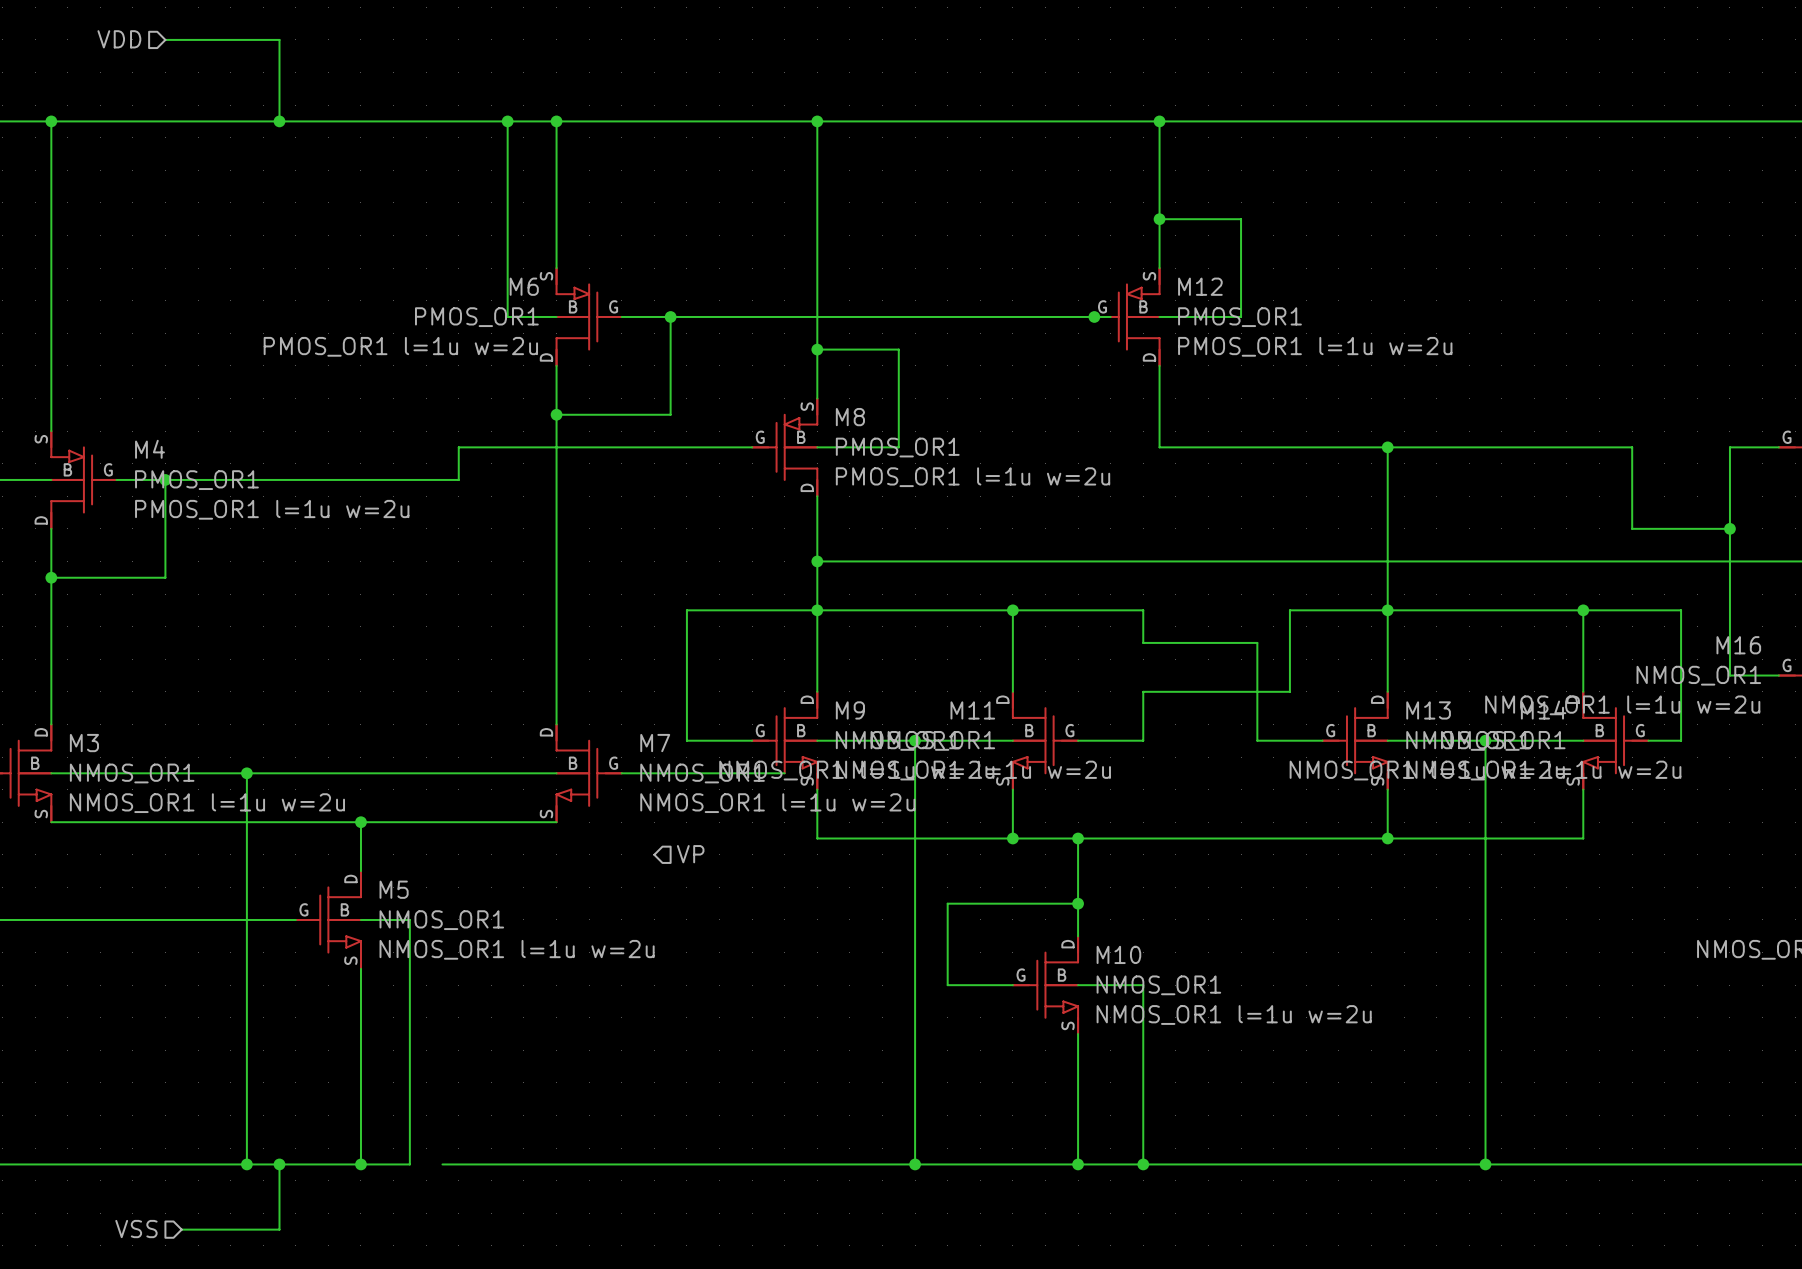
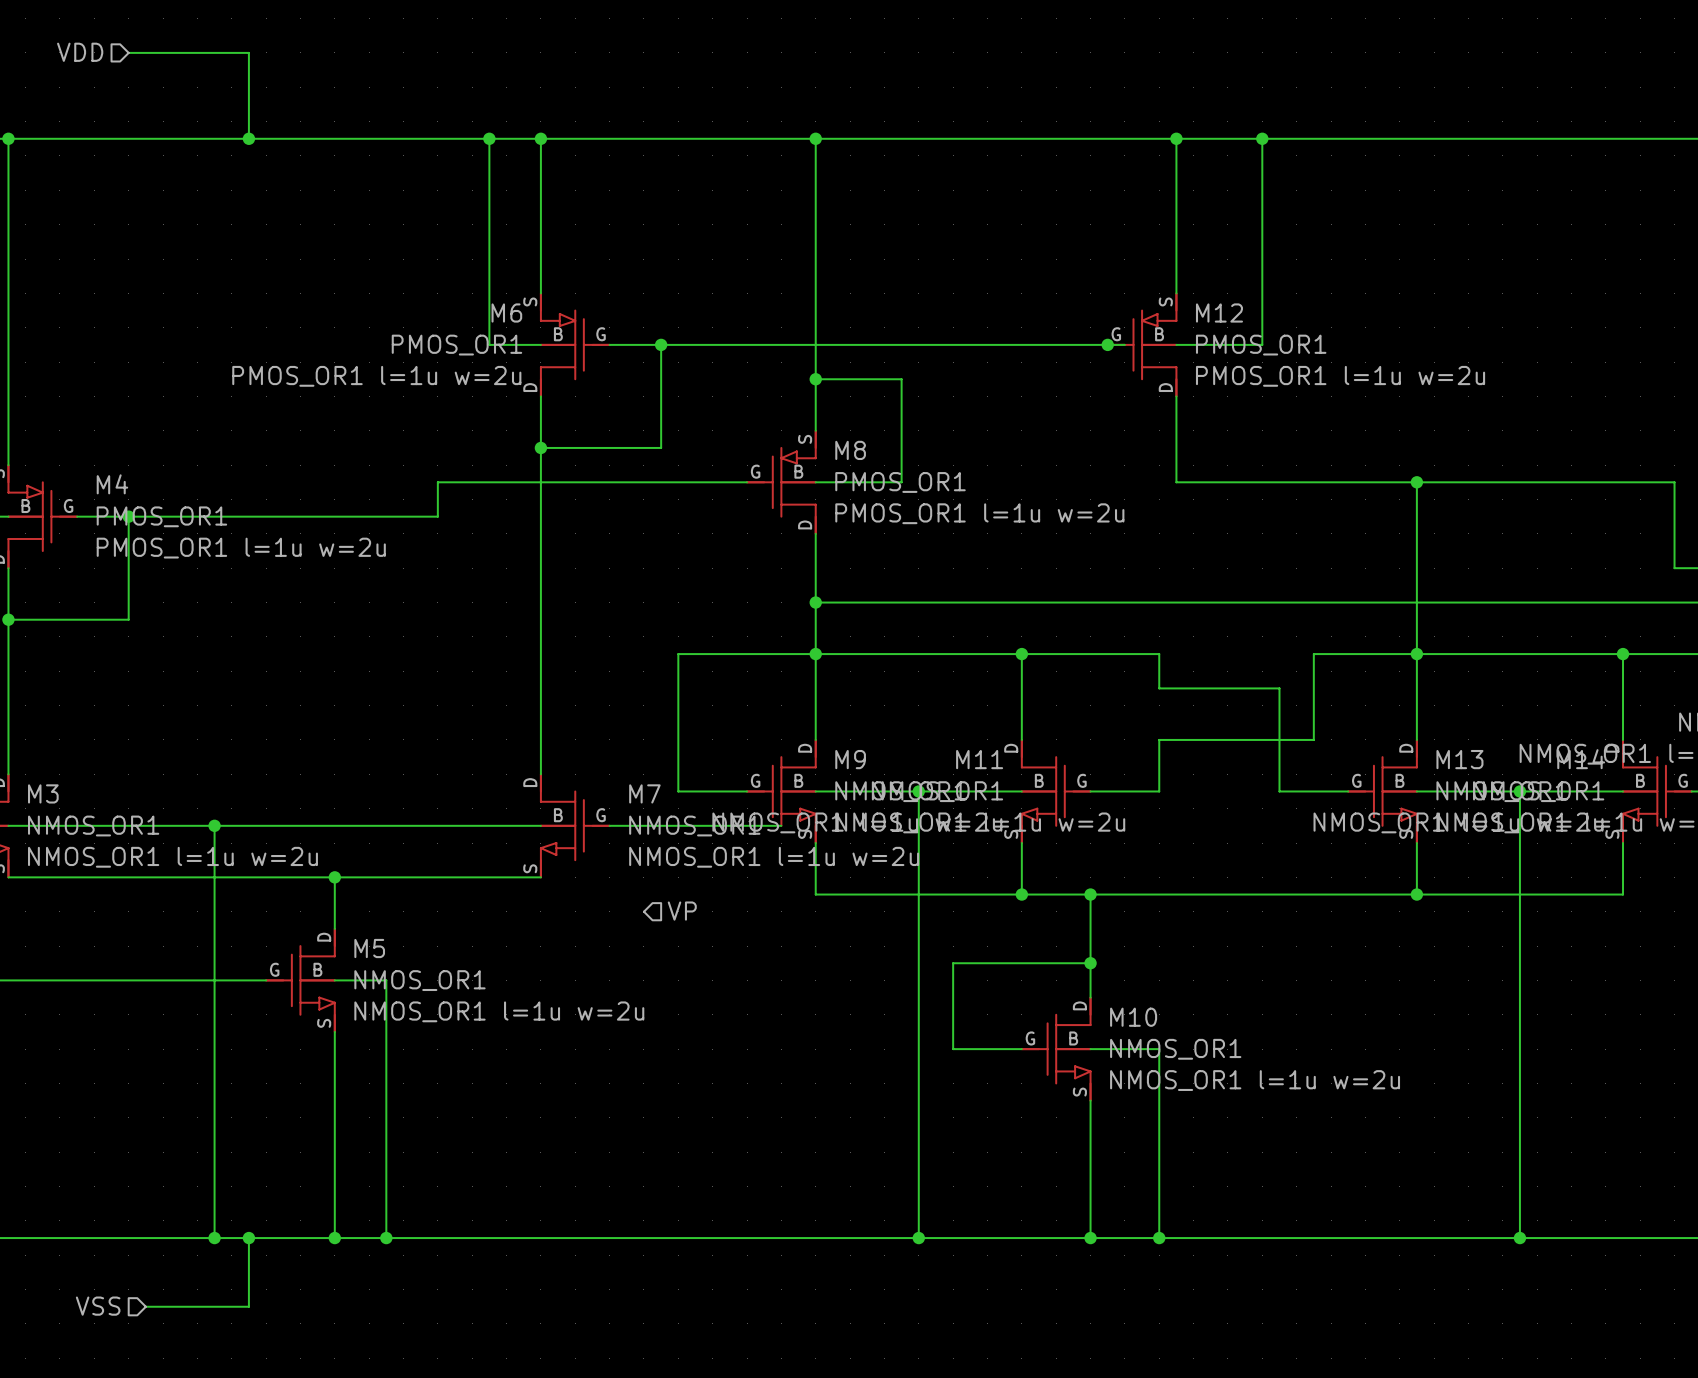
junction: none -> (1262, 138)
wire: (1159, 219) (1241, 219) -> (1262, 138) (1262, 241)
junction: (1159, 219) -> none
wire: none -> (386, 1238) (420, 1238)
junction: none -> (386, 1238)

